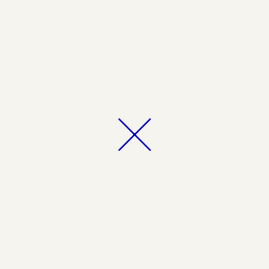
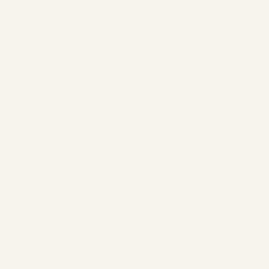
no-connect mark: (134, 134) -> none

